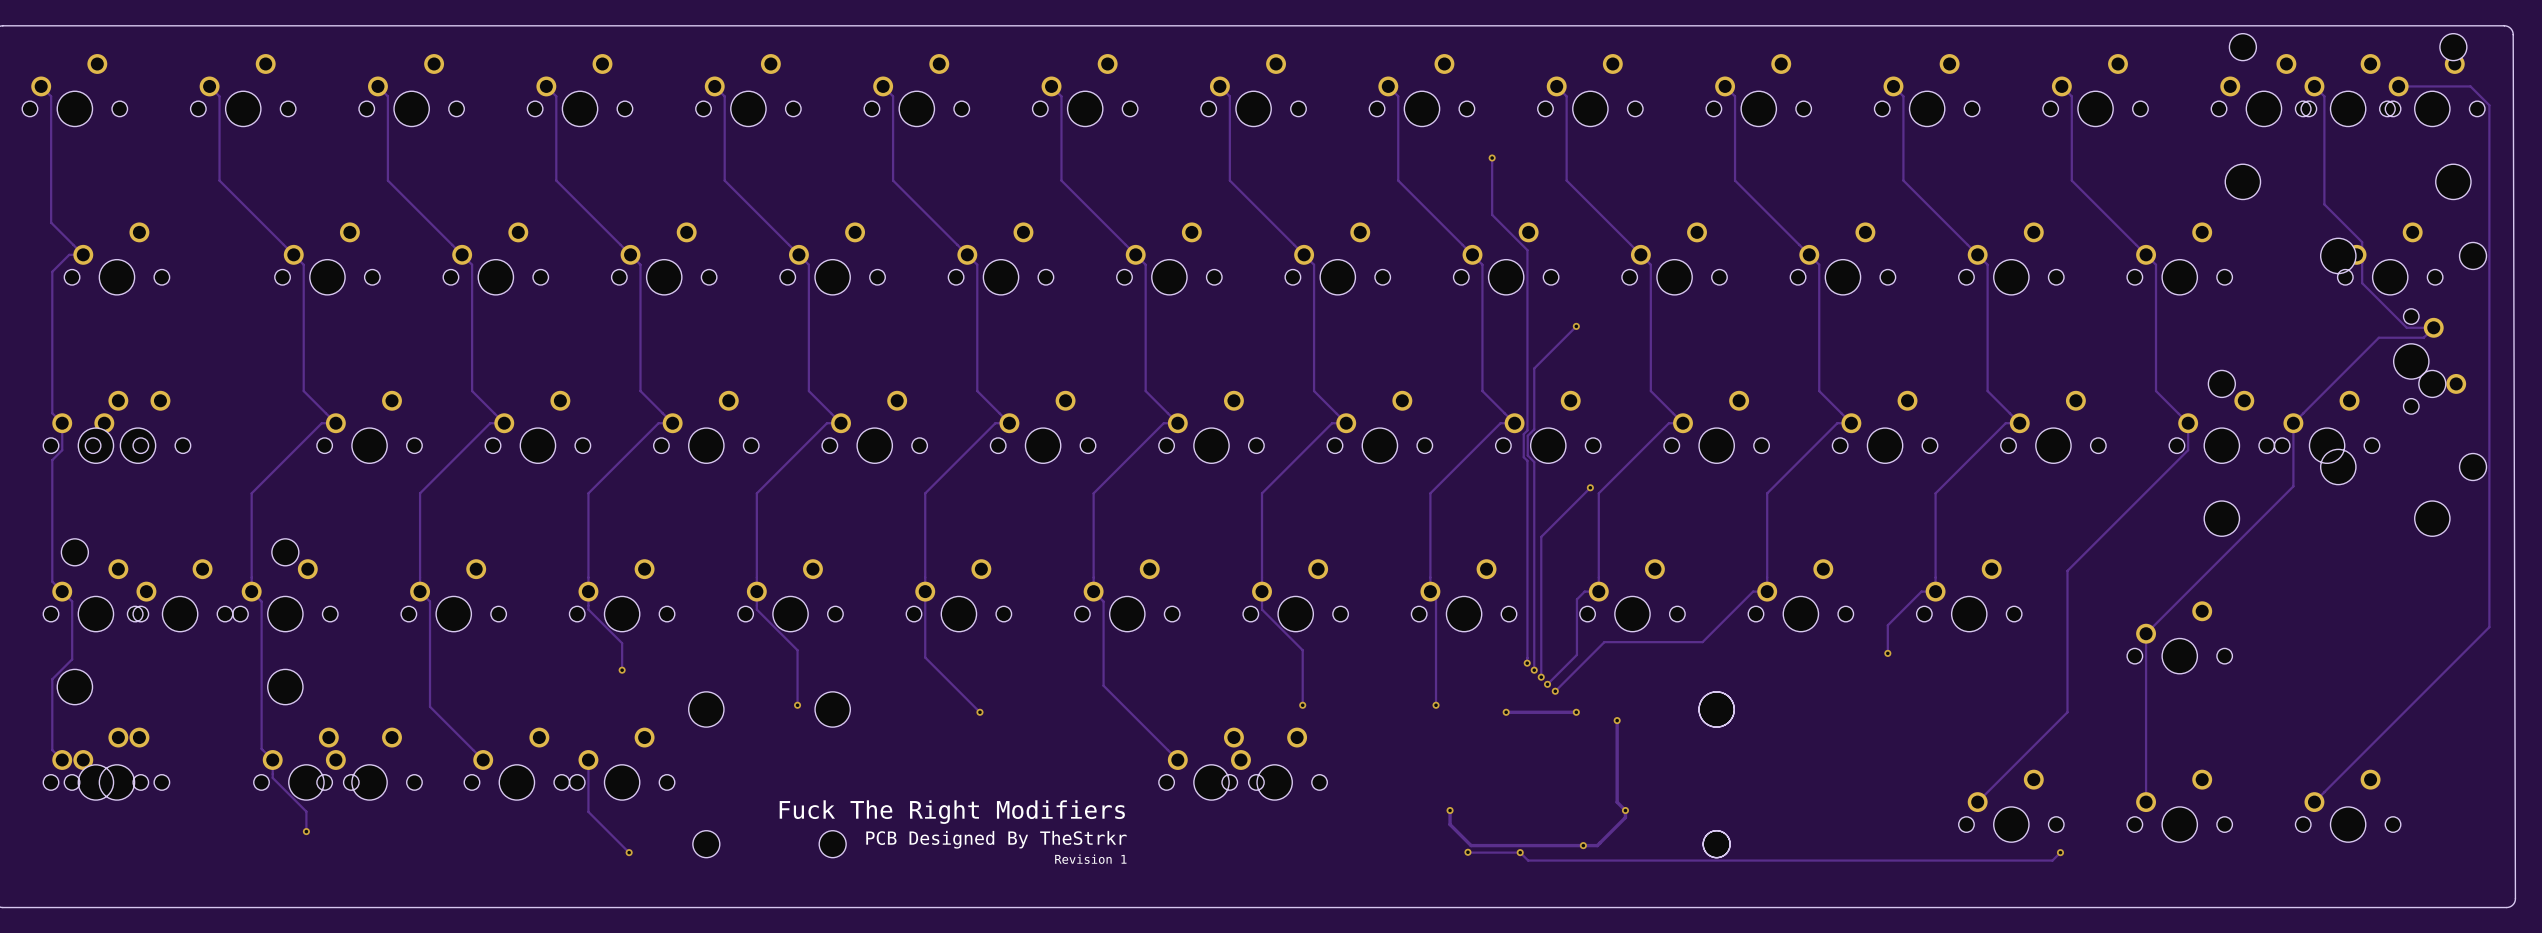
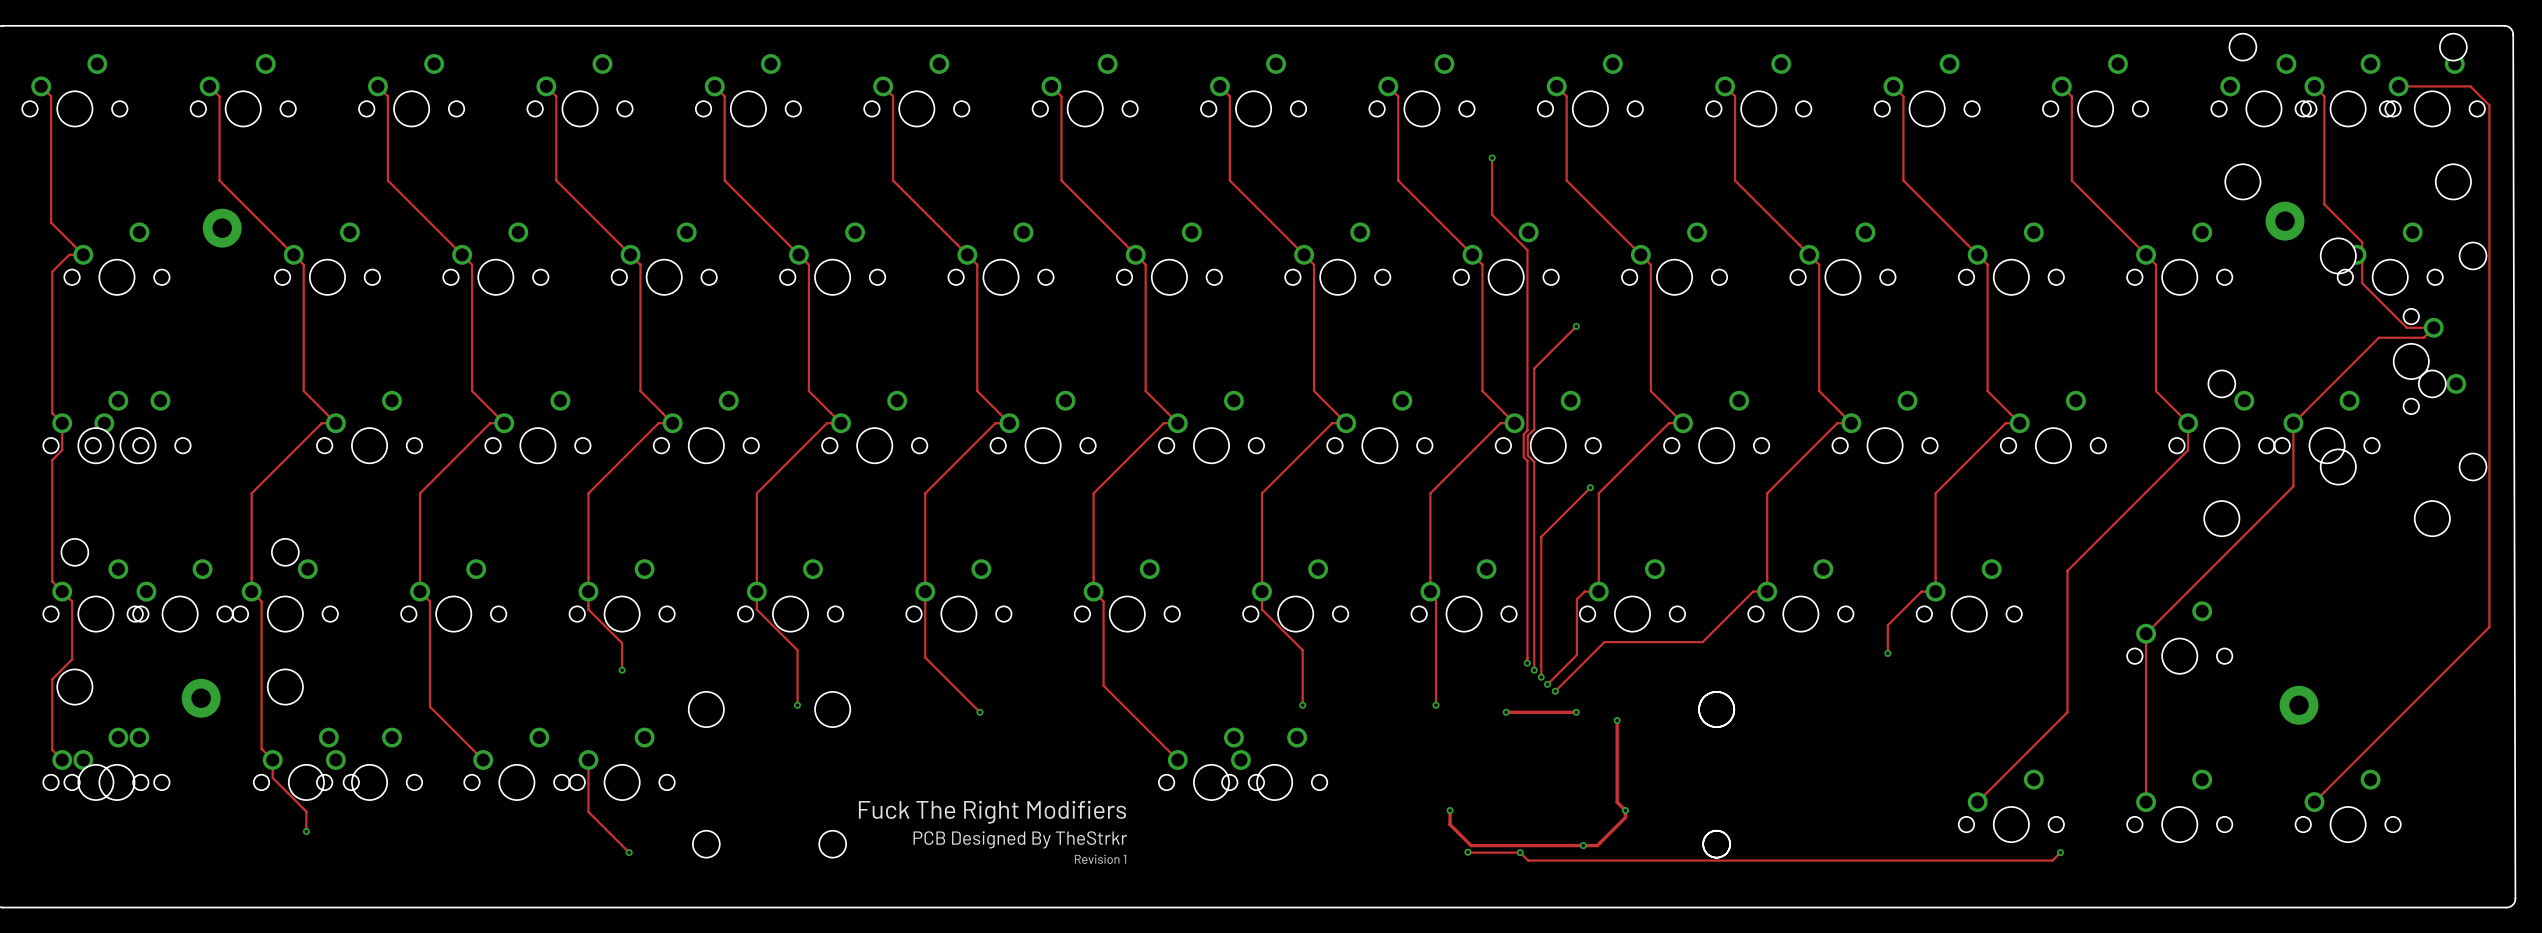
part: none -> (2284, 221)
part: none -> (222, 228)
part: none -> (201, 698)
part: none -> (2299, 705)

